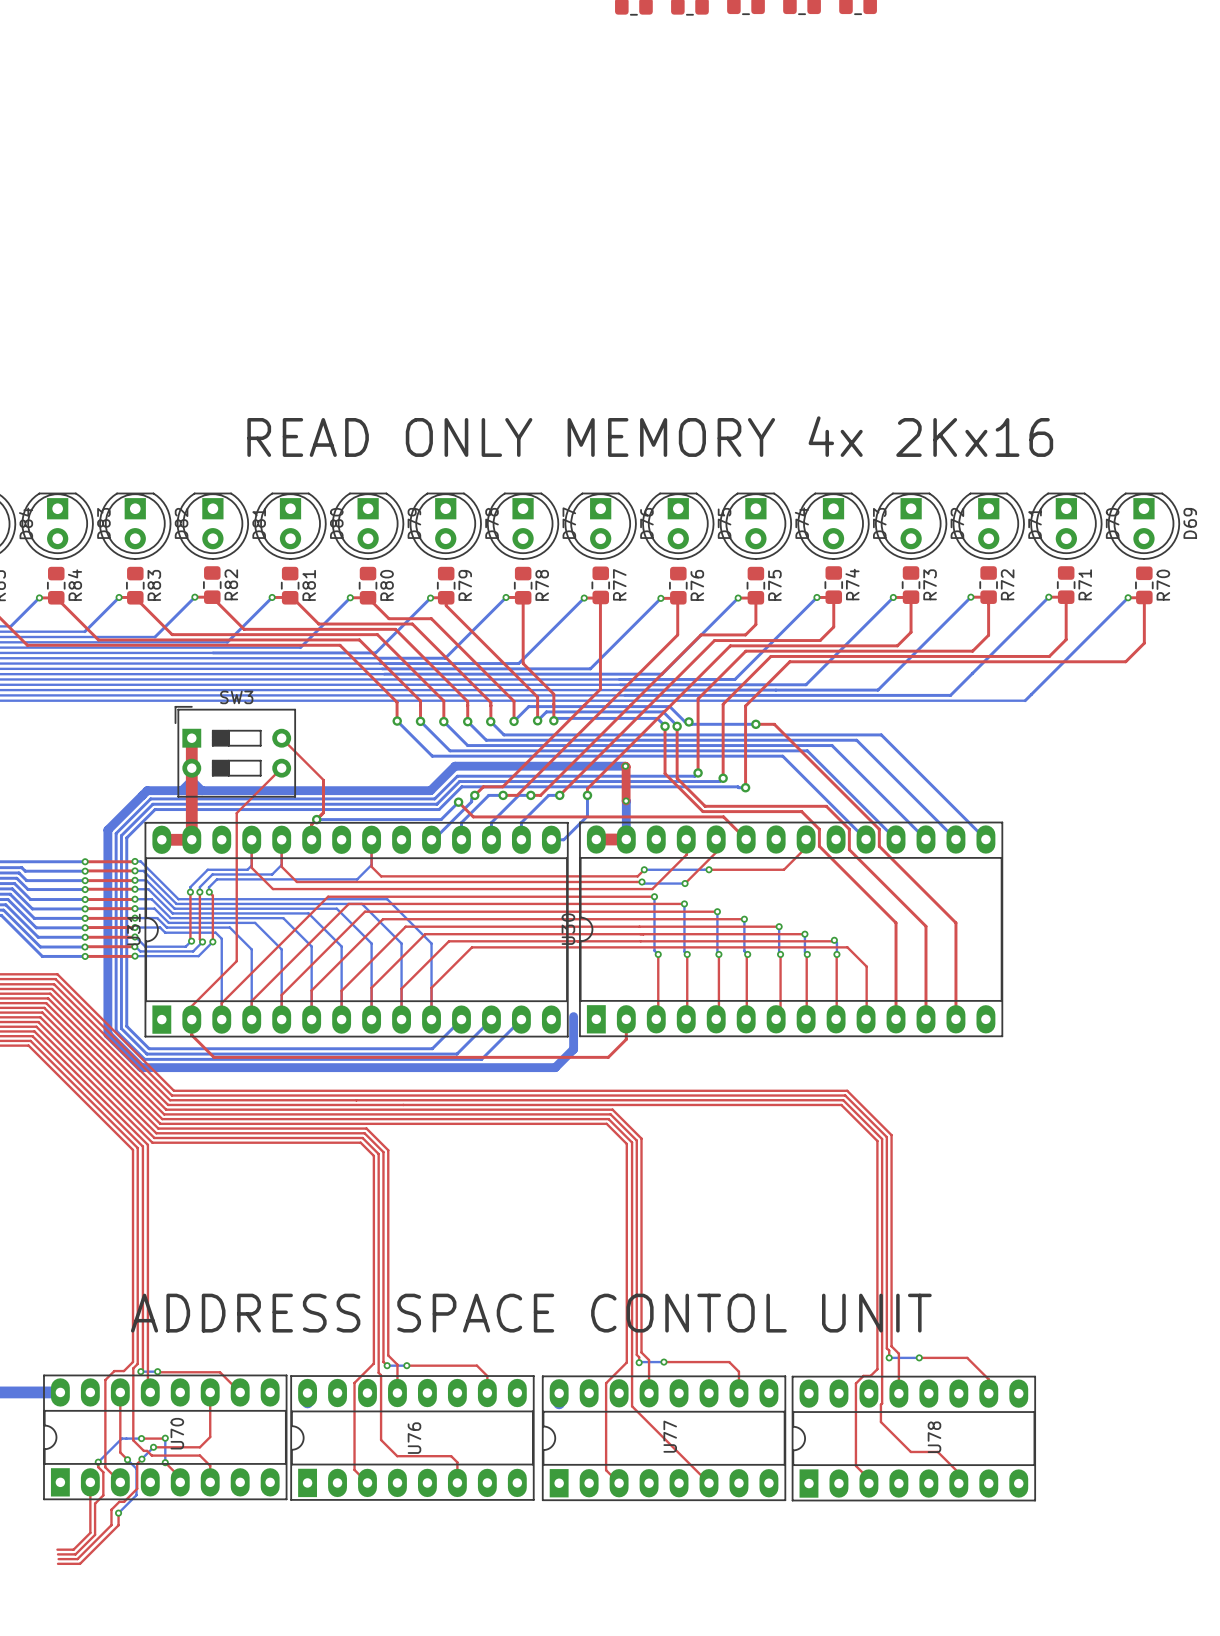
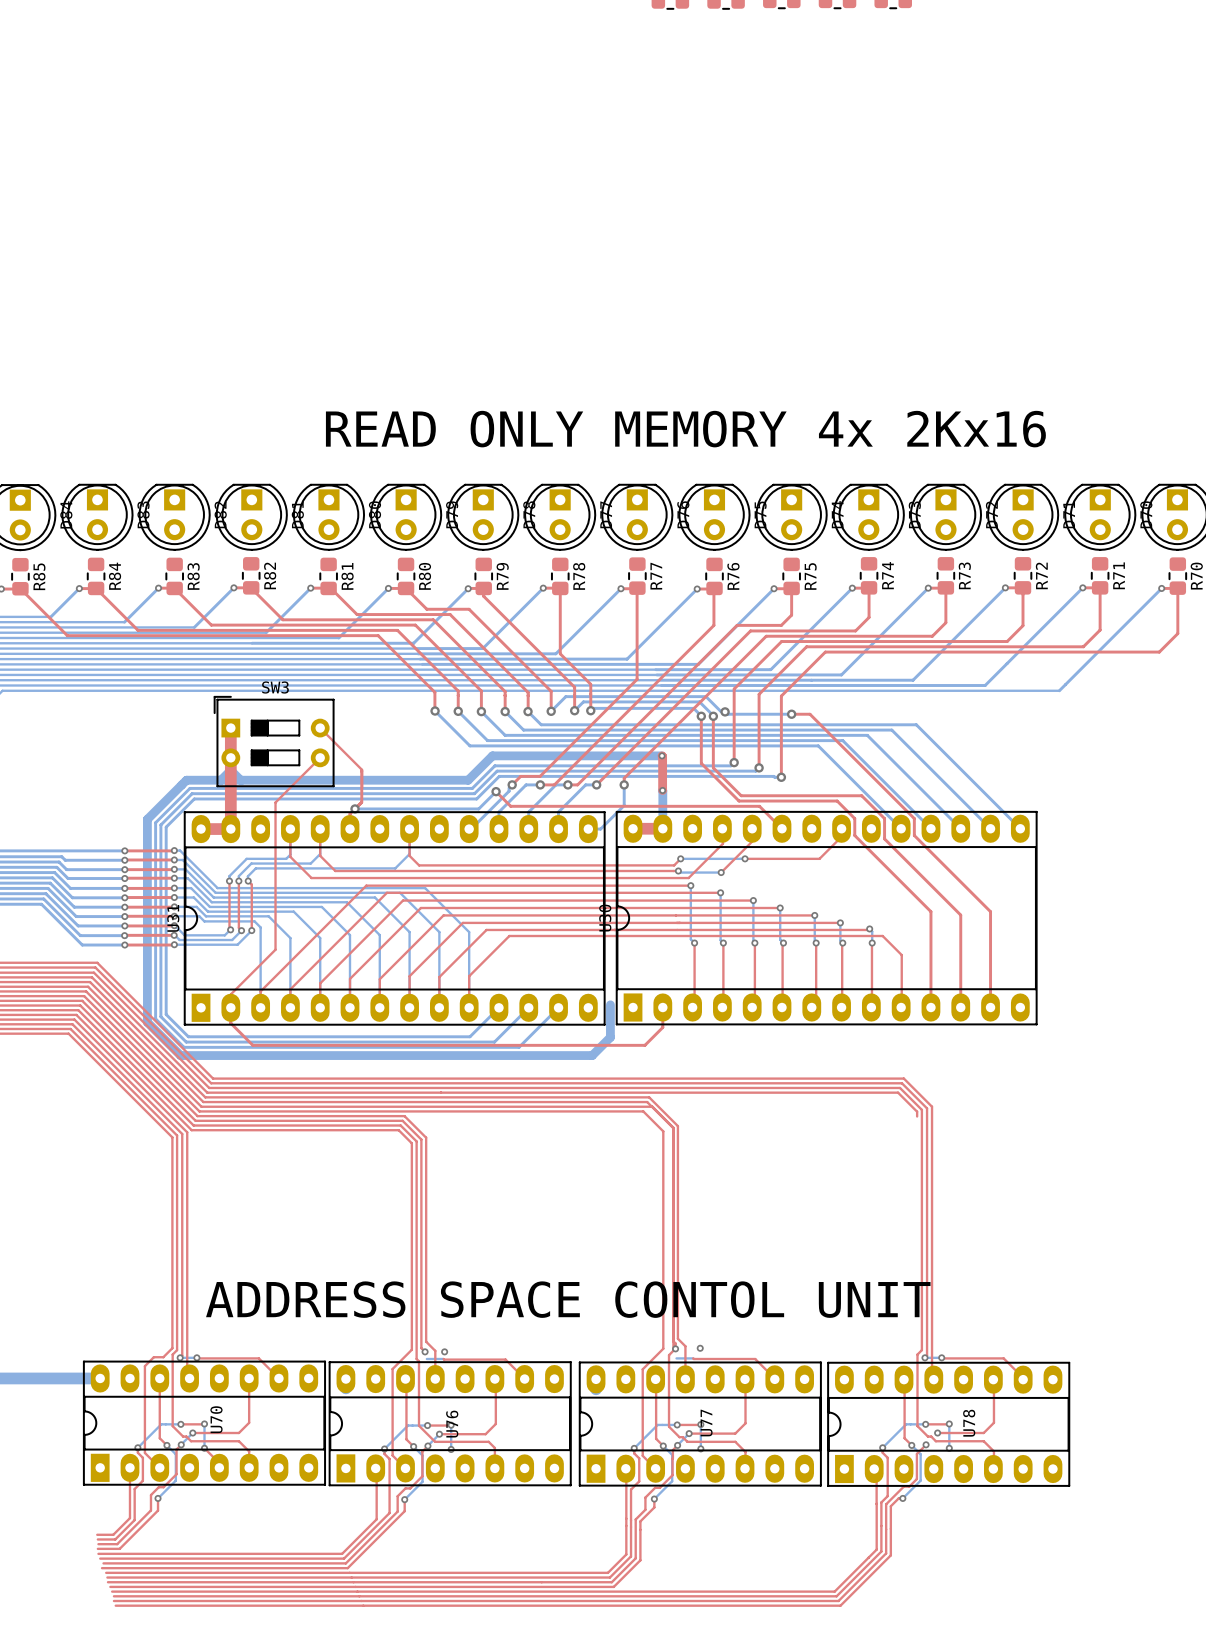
top track: (847, 1090) (891, 1135) (891, 1346) (898, 1353) (898, 1393) -> (882, 1078) (903, 1078) (932, 1106) (932, 1376) (934, 1378)
top track: (845, 1095) (886, 1137) (886, 1348) (889, 1350) (889, 1357) -> (880, 1083) (901, 1083) (927, 1108) (927, 1355) (924, 1357)
top track: (843, 1100) (882, 1139) (880, 1422) (910, 1451) (937, 1451) (958, 1472) -> (878, 1087) (900, 1087) (921, 1109) (921, 1350) (917, 1354) (917, 1426) (935, 1441) (983, 1441) (993, 1451) (993, 1467)
top track: (841, 1104) (877, 1140) (877, 1369) (870, 1375) (863, 1375) (855, 1383) (855, 1465) (868, 1478) -> (876, 1092) (898, 1092) (917, 1111) (917, 1116)
top track: (608, 1119) (632, 1142) (632, 1406) (708, 1483) -> (645, 1106) (652, 1106) (673, 1127) (673, 1350) (669, 1355) (669, 1426) (687, 1441) (735, 1441) (745, 1452) (745, 1468)
bottom track: (889, 1357) (919, 1357) -> none
via: (889, 1357) -> none
top track: (919, 1357) (967, 1357) (988, 1379) (988, 1393) -> none
via: (919, 1357) -> none
bottom track: (663, 1362) (639, 1362) -> none
top track: (663, 1362) (729, 1362) (738, 1371) (738, 1393) -> none
bottom track: (387, 1365) (406, 1365) -> none
top track: (406, 1365) (476, 1365) (487, 1376) (487, 1393) -> none
bottom track: none -> (924, 1357) (941, 1357)
via: none -> (924, 1357)
top track: none -> (941, 1357) (1003, 1358) (1023, 1378)
via: none -> (941, 1357)
bottom track: none -> (426, 1359) (443, 1359)
top track: none -> (443, 1359) (505, 1359) (525, 1379)
bottom track: none -> (676, 1358) (693, 1358)
top track: none -> (693, 1358) (755, 1359) (775, 1379)
top track: none -> (904, 1378) (904, 1438) (911, 1445)
top track: none -> (993, 1378) (993, 1422) (983, 1433) (937, 1433)
top track: none -> (406, 1379) (406, 1439) (413, 1446)
top track: none -> (495, 1379) (495, 1423) (485, 1434) (439, 1434)
top track: none -> (656, 1379) (656, 1438) (663, 1446)
top track: none -> (745, 1379) (745, 1423) (735, 1433) (689, 1433)
bottom track: none -> (700, 1424) (700, 1448)
top track: none -> (700, 1424) (677, 1424)
via: none -> (700, 1424)
bottom track: none -> (925, 1424) (906, 1424) (882, 1447)
via: none -> (925, 1424)
bottom track: none -> (949, 1423) (949, 1448)
top track: none -> (949, 1423) (925, 1424)
via: none -> (949, 1423)
bottom track: none -> (427, 1425) (408, 1425) (384, 1448)
via: none -> (427, 1425)
bottom track: none -> (451, 1425) (451, 1449)
top track: none -> (451, 1425) (427, 1425)
via: none -> (451, 1425)
bottom track: none -> (677, 1424) (657, 1424) (634, 1448)
via: none -> (677, 1424)
bottom track: none -> (689, 1433) (677, 1445)
via: none -> (689, 1433)
via: none -> (937, 1433)
bottom track: none -> (439, 1434) (427, 1446)
via: none -> (439, 1434)
top track: none -> (677, 1445) (672, 1450) (672, 1475) (659, 1487) (655, 1487) (645, 1497) (645, 1509) (635, 1519) (635, 1558) (611, 1582) (107, 1582)
via: none -> (677, 1445)
bottom track: none -> (911, 1445) (920, 1454) (920, 1480) (902, 1498)
via: none -> (911, 1445)
top track: none -> (926, 1444) (916, 1453) (916, 1479) (909, 1486) (903, 1486) (886, 1504) (886, 1553) (838, 1601) (113, 1601)
via: none -> (926, 1444)
bottom track: none -> (413, 1446) (422, 1455) (422, 1481) (404, 1499)
via: none -> (413, 1446)
top track: none -> (427, 1446) (422, 1451) (422, 1476) (410, 1488) (405, 1488) (397, 1496) (397, 1511) (345, 1563) (103, 1563)
via: none -> (427, 1446)
bottom track: none -> (663, 1446) (672, 1454) (672, 1481) (654, 1499)
via: none -> (663, 1446)
top track: none -> (634, 1448) (634, 1453) (639, 1458) (639, 1481) (631, 1489) (631, 1556) (609, 1577) (107, 1577)
via: none -> (634, 1448)
top track: none -> (882, 1447) (882, 1452) (887, 1457) (887, 1496) (881, 1502) (881, 1551) (836, 1596) (113, 1596)
via: none -> (882, 1447)
via: none -> (949, 1448)
top track: none -> (384, 1448) (384, 1453) (389, 1459) (389, 1513) (344, 1558) (100, 1558)
via: none -> (384, 1448)
via: none -> (451, 1449)
via: none -> (700, 1448)
top track: none -> (626, 1468) (626, 1554) (607, 1572) (106, 1572)
top track: none -> (874, 1467) (876, 1471) (876, 1503)
top track: none -> (376, 1469) (376, 1519) (342, 1553) (98, 1553)
top track: none -> (654, 1499) (654, 1507) (640, 1521) (640, 1560) (613, 1586) (110, 1586)
via: none -> (654, 1499)
top track: none -> (902, 1498) (898, 1498) (890, 1506) (890, 1555) (840, 1605) (115, 1605)
via: none -> (902, 1498)
top track: none -> (404, 1499) (404, 1511) (347, 1568) (102, 1568)
via: none -> (404, 1499)
top track: none -> (876, 1503) (876, 1549) (834, 1591) (112, 1591)

